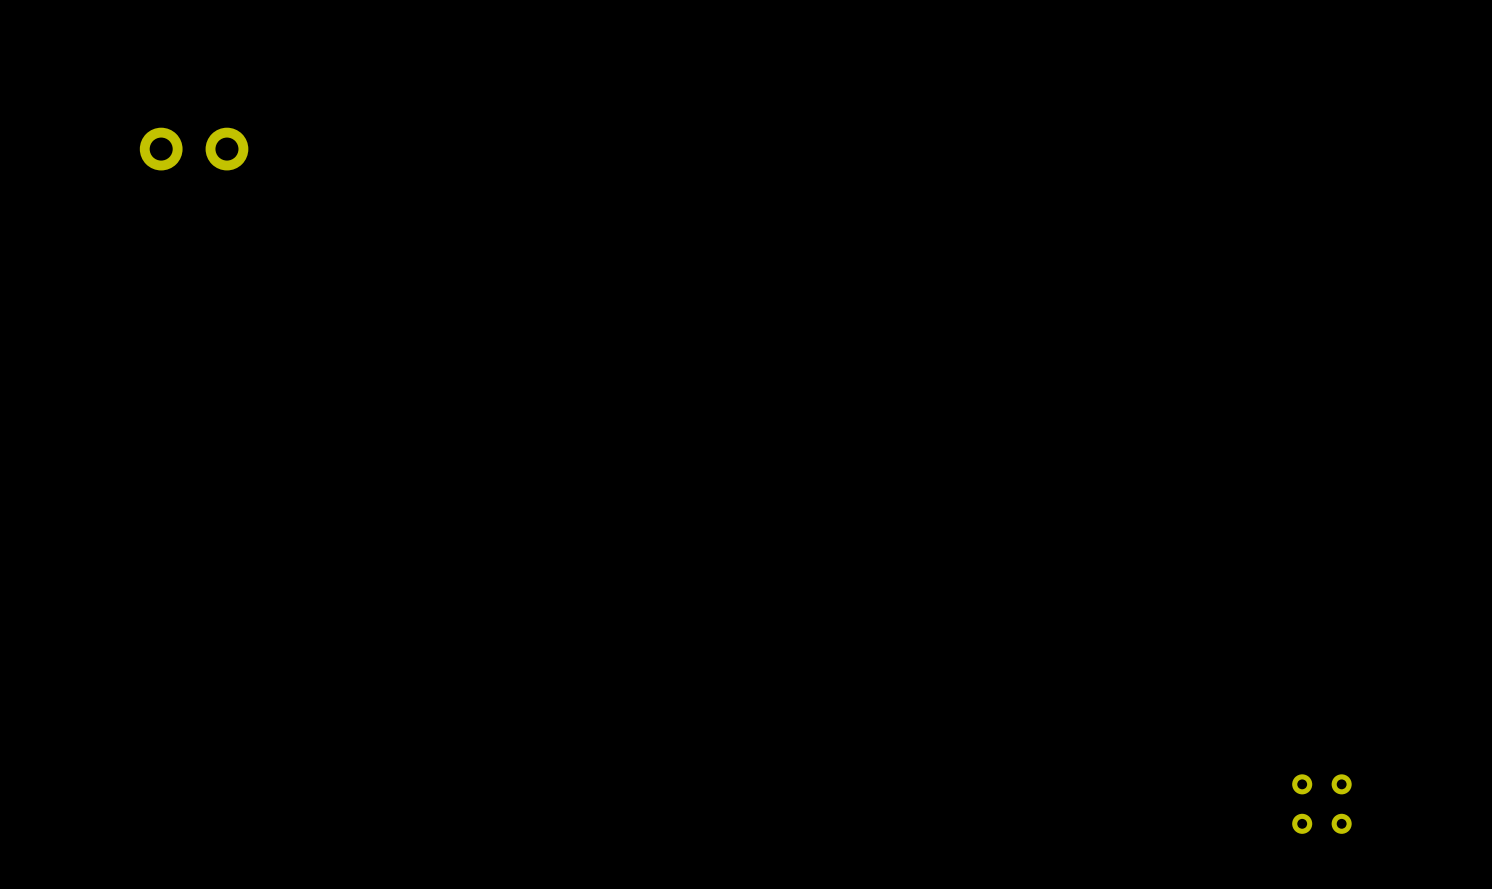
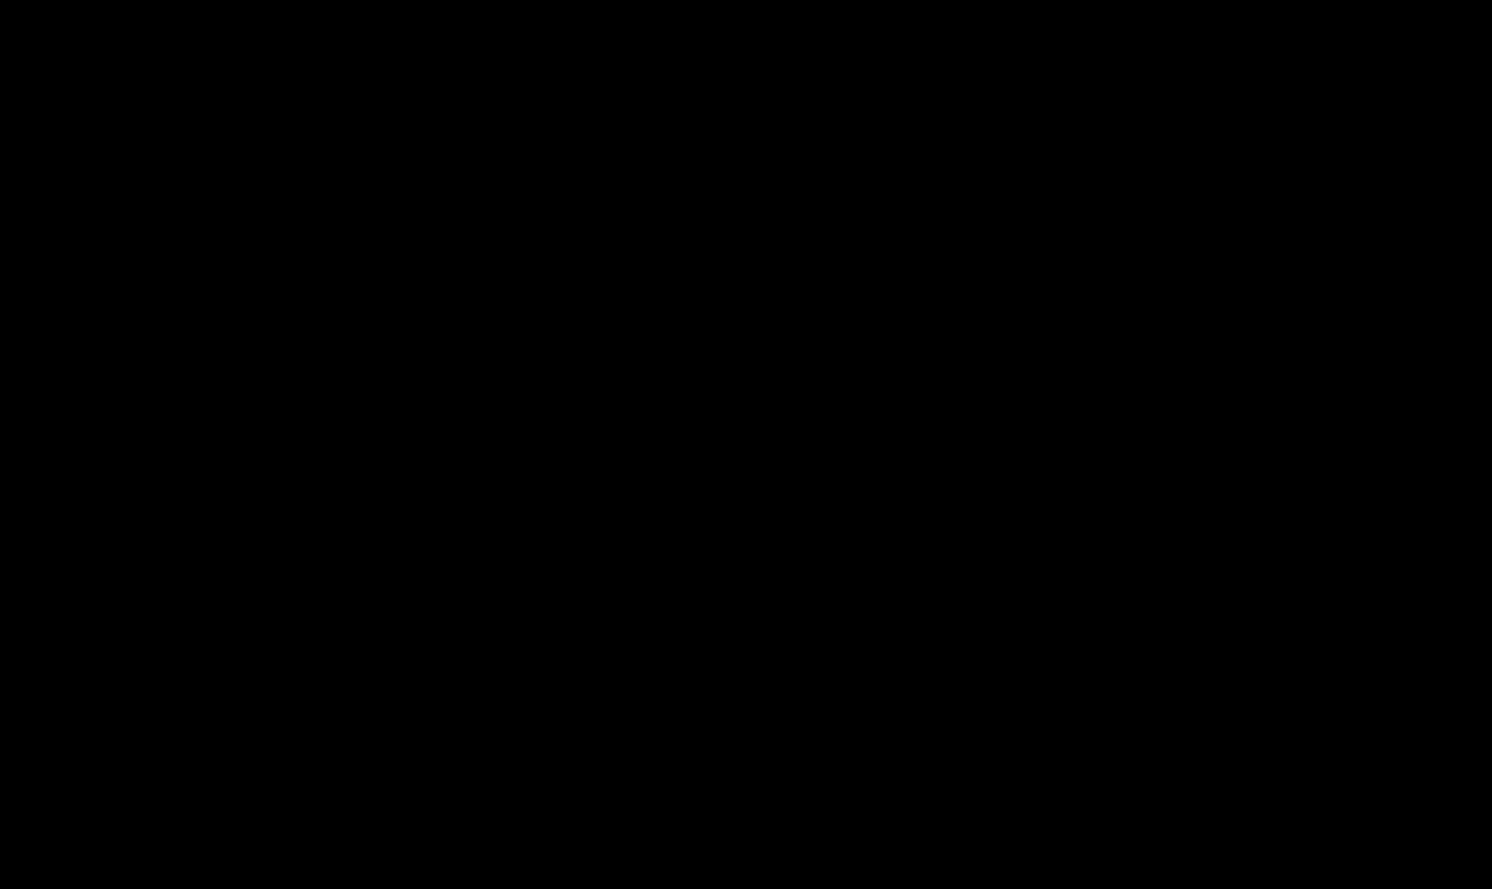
part: (194, 149) -> none
part: (1321, 804) -> none

